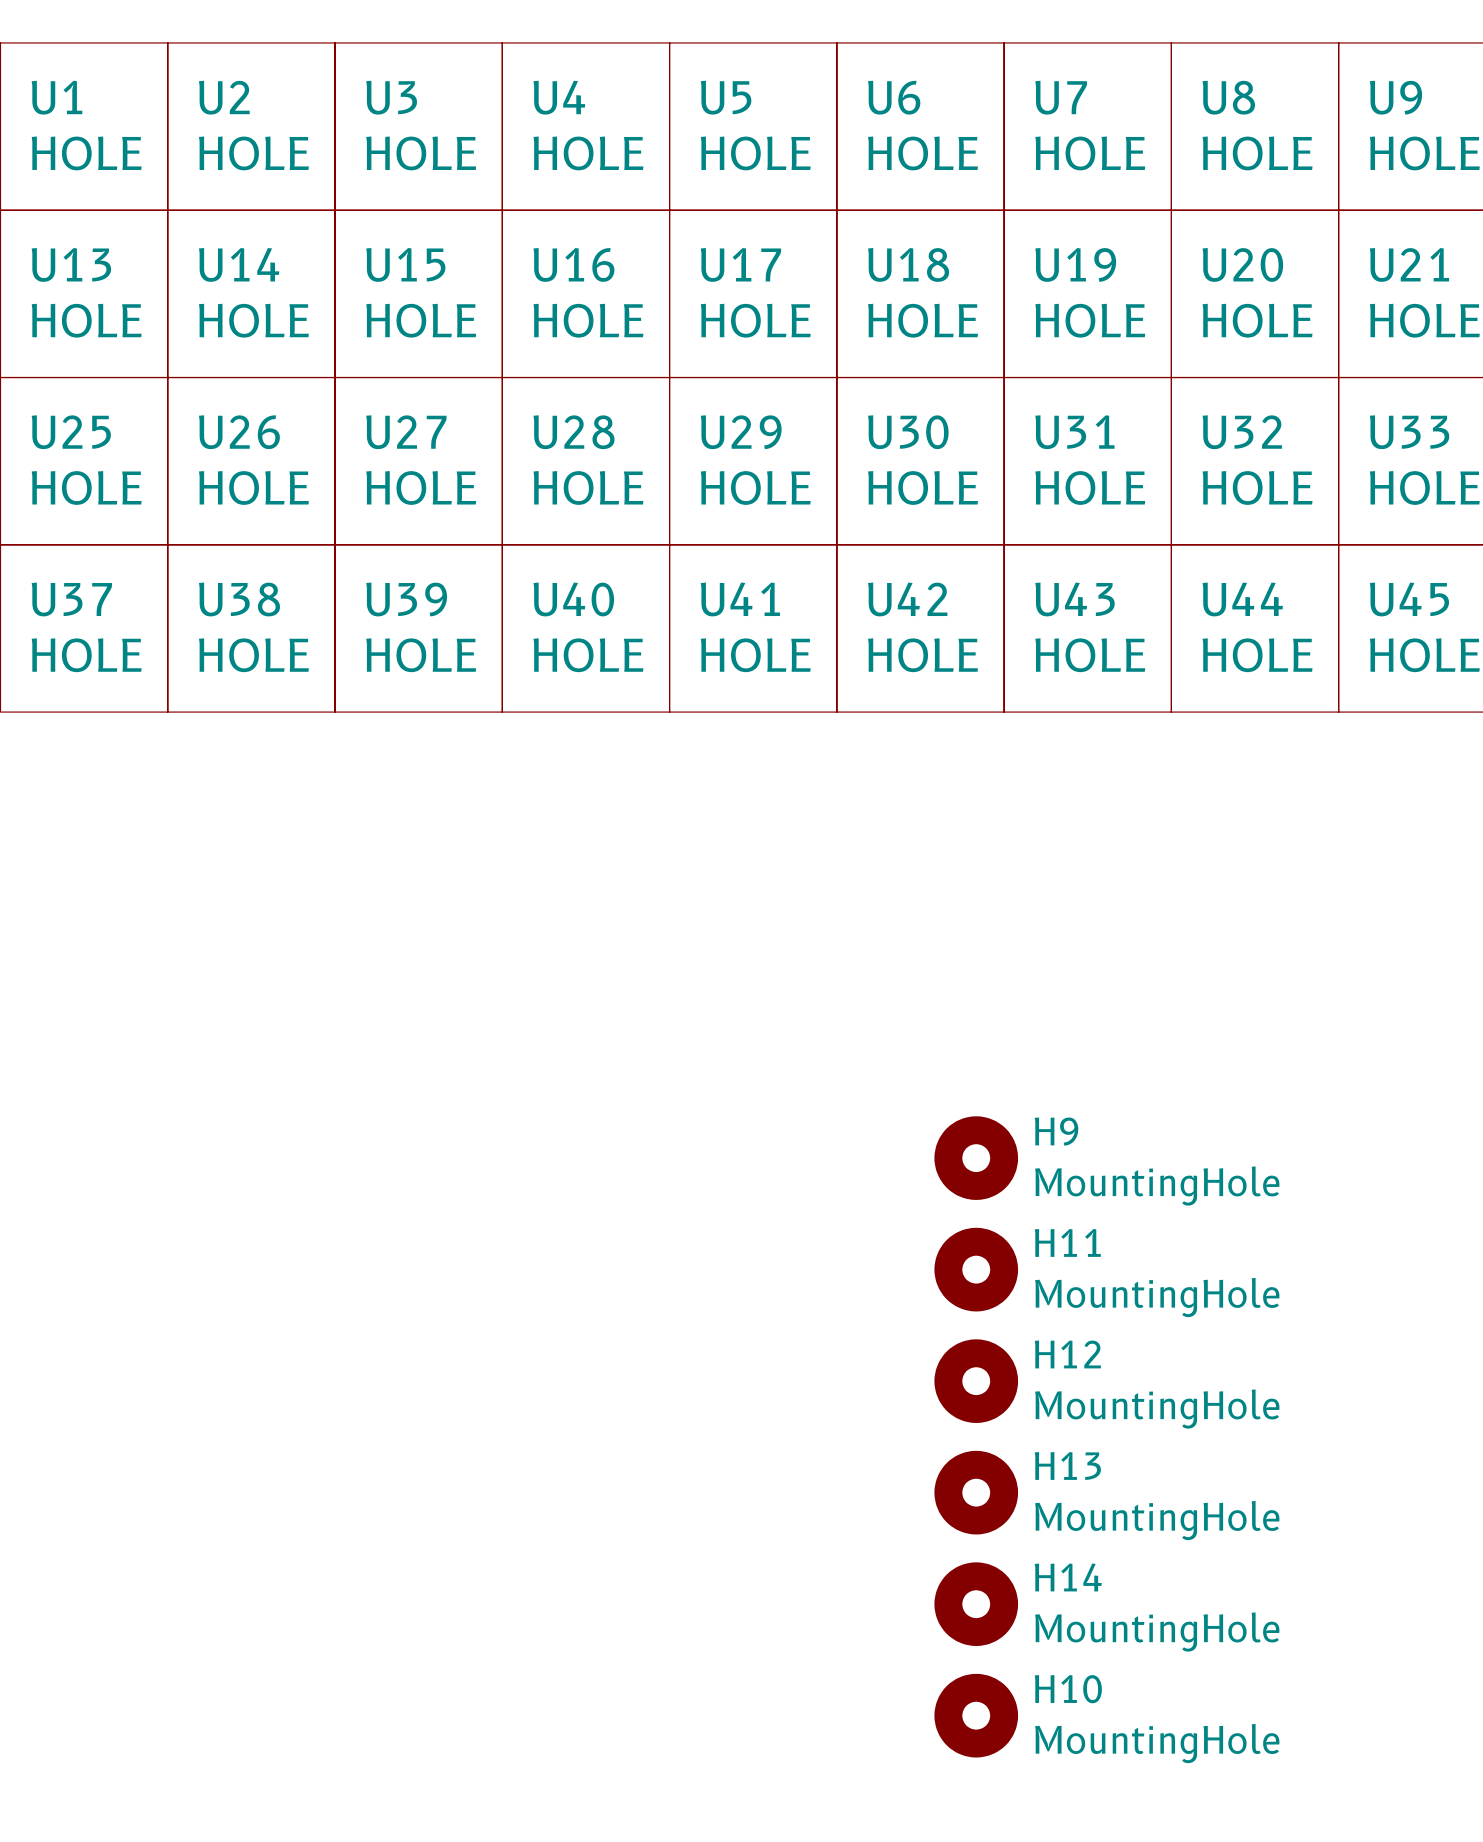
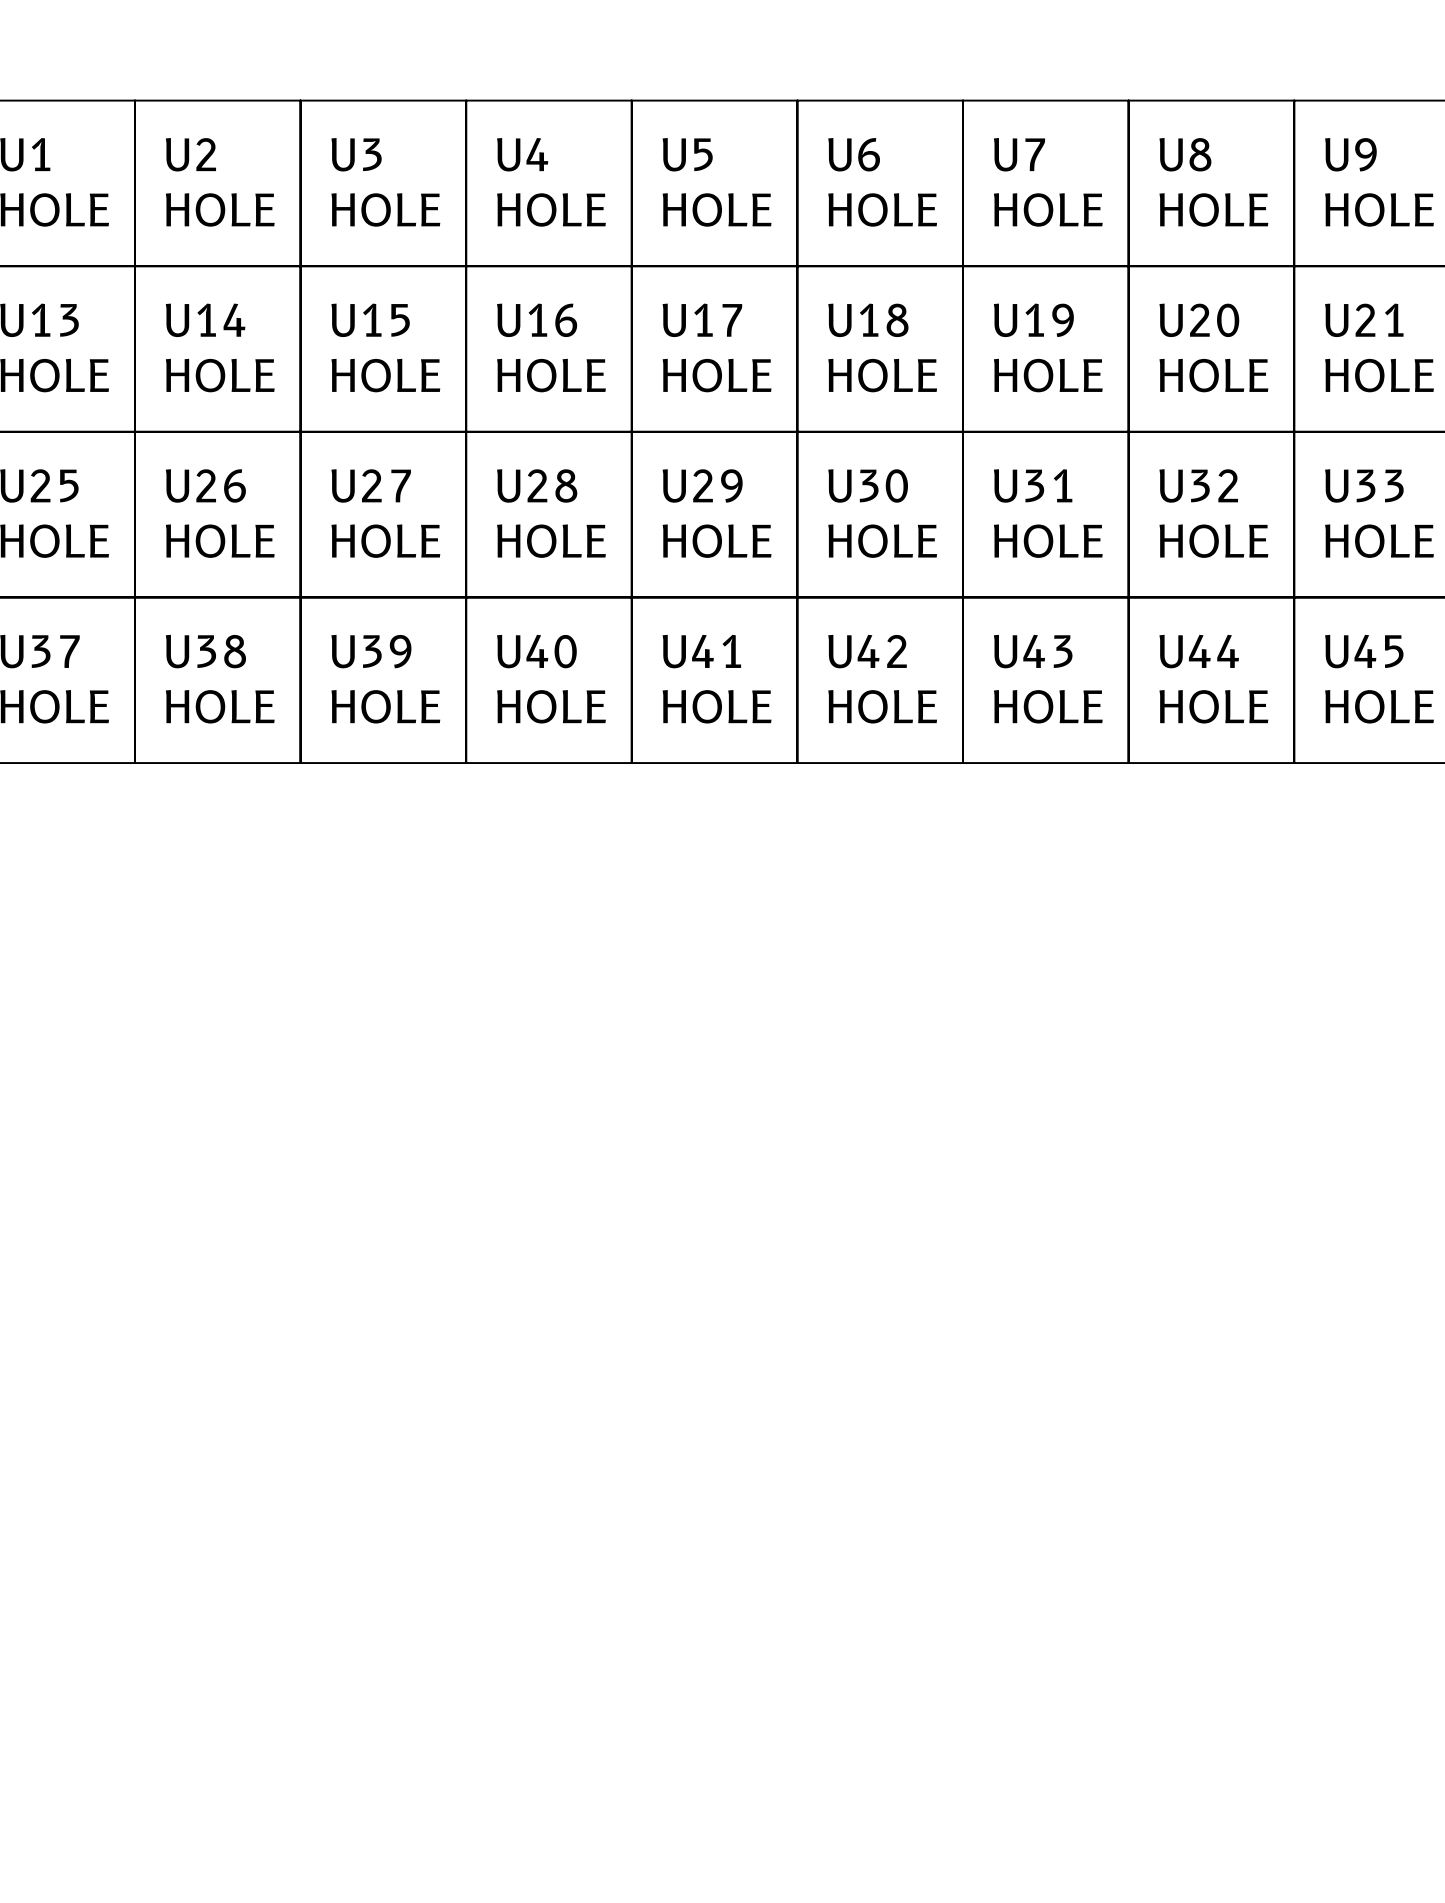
H9: MountingHole (976, 1158) -> none
H11: MountingHole (976, 1269) -> none
H12: MountingHole (976, 1381) -> none
H13: MountingHole (976, 1492) -> none
H14: MountingHole (976, 1604) -> none
H10: MountingHole (976, 1715) -> none

